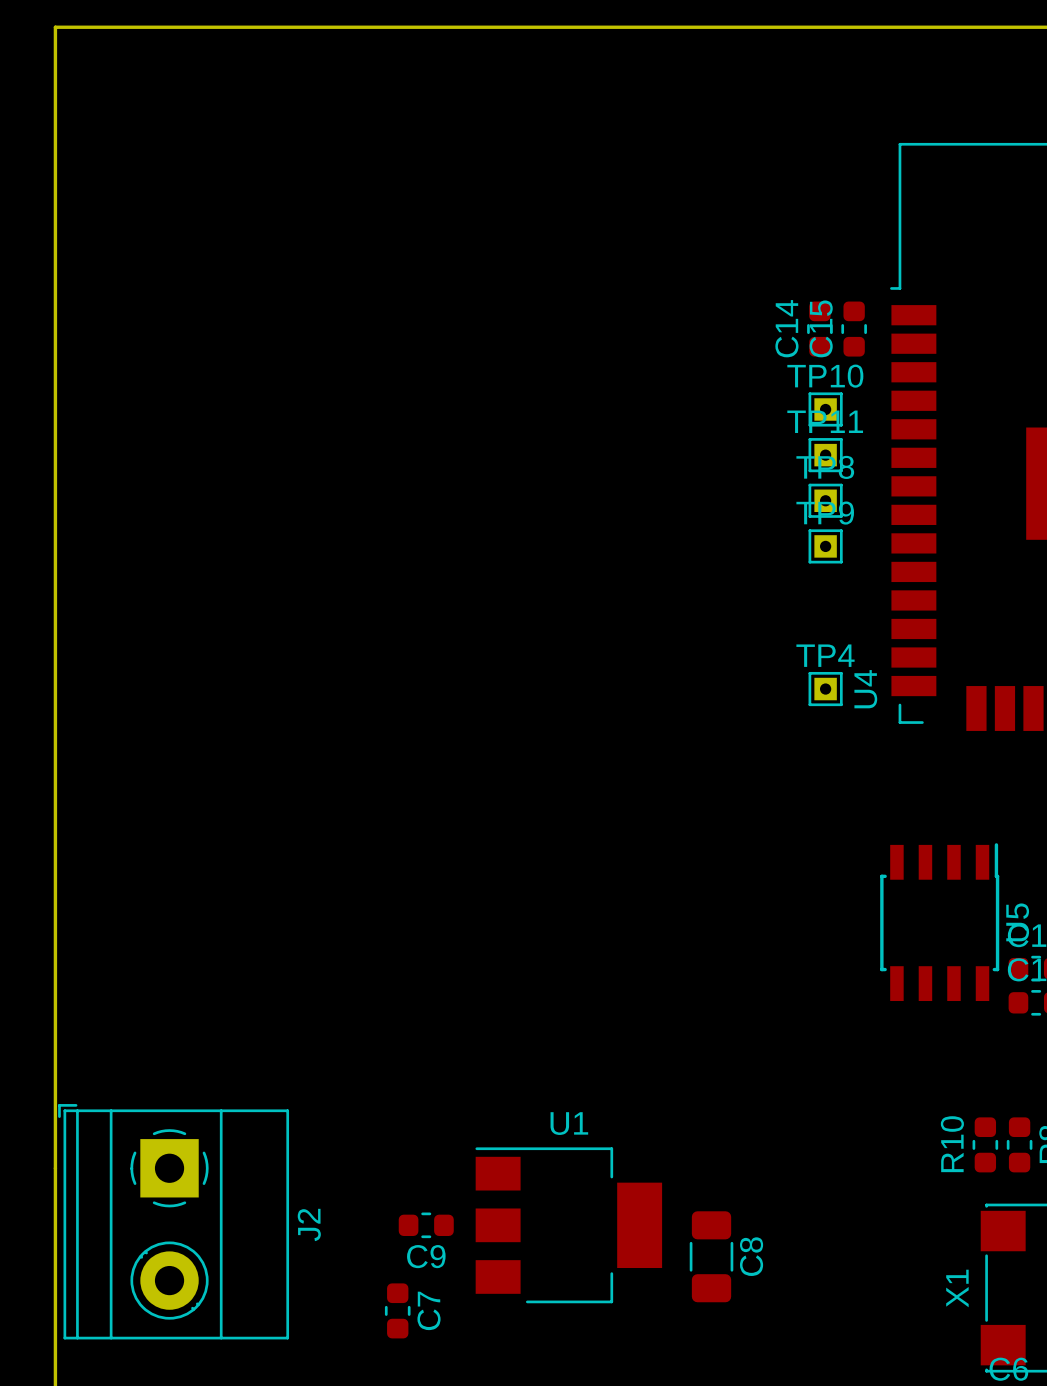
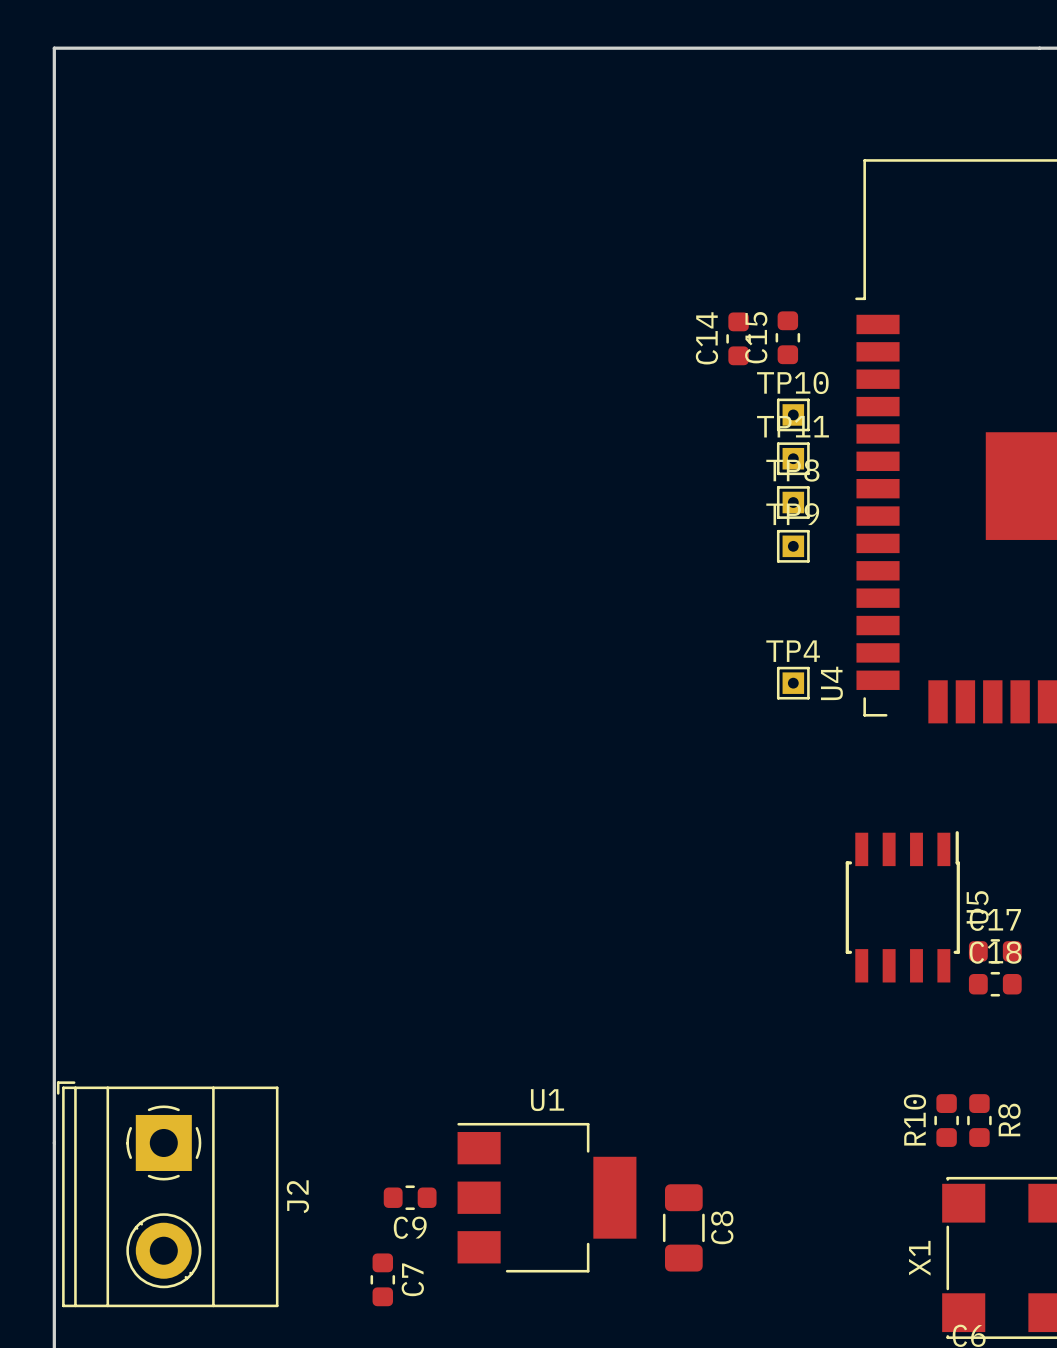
C14 name: C14 (786, 328) -> C15 (756, 337)
C15: (854, 329) -> none
C14: none -> (738, 338)

